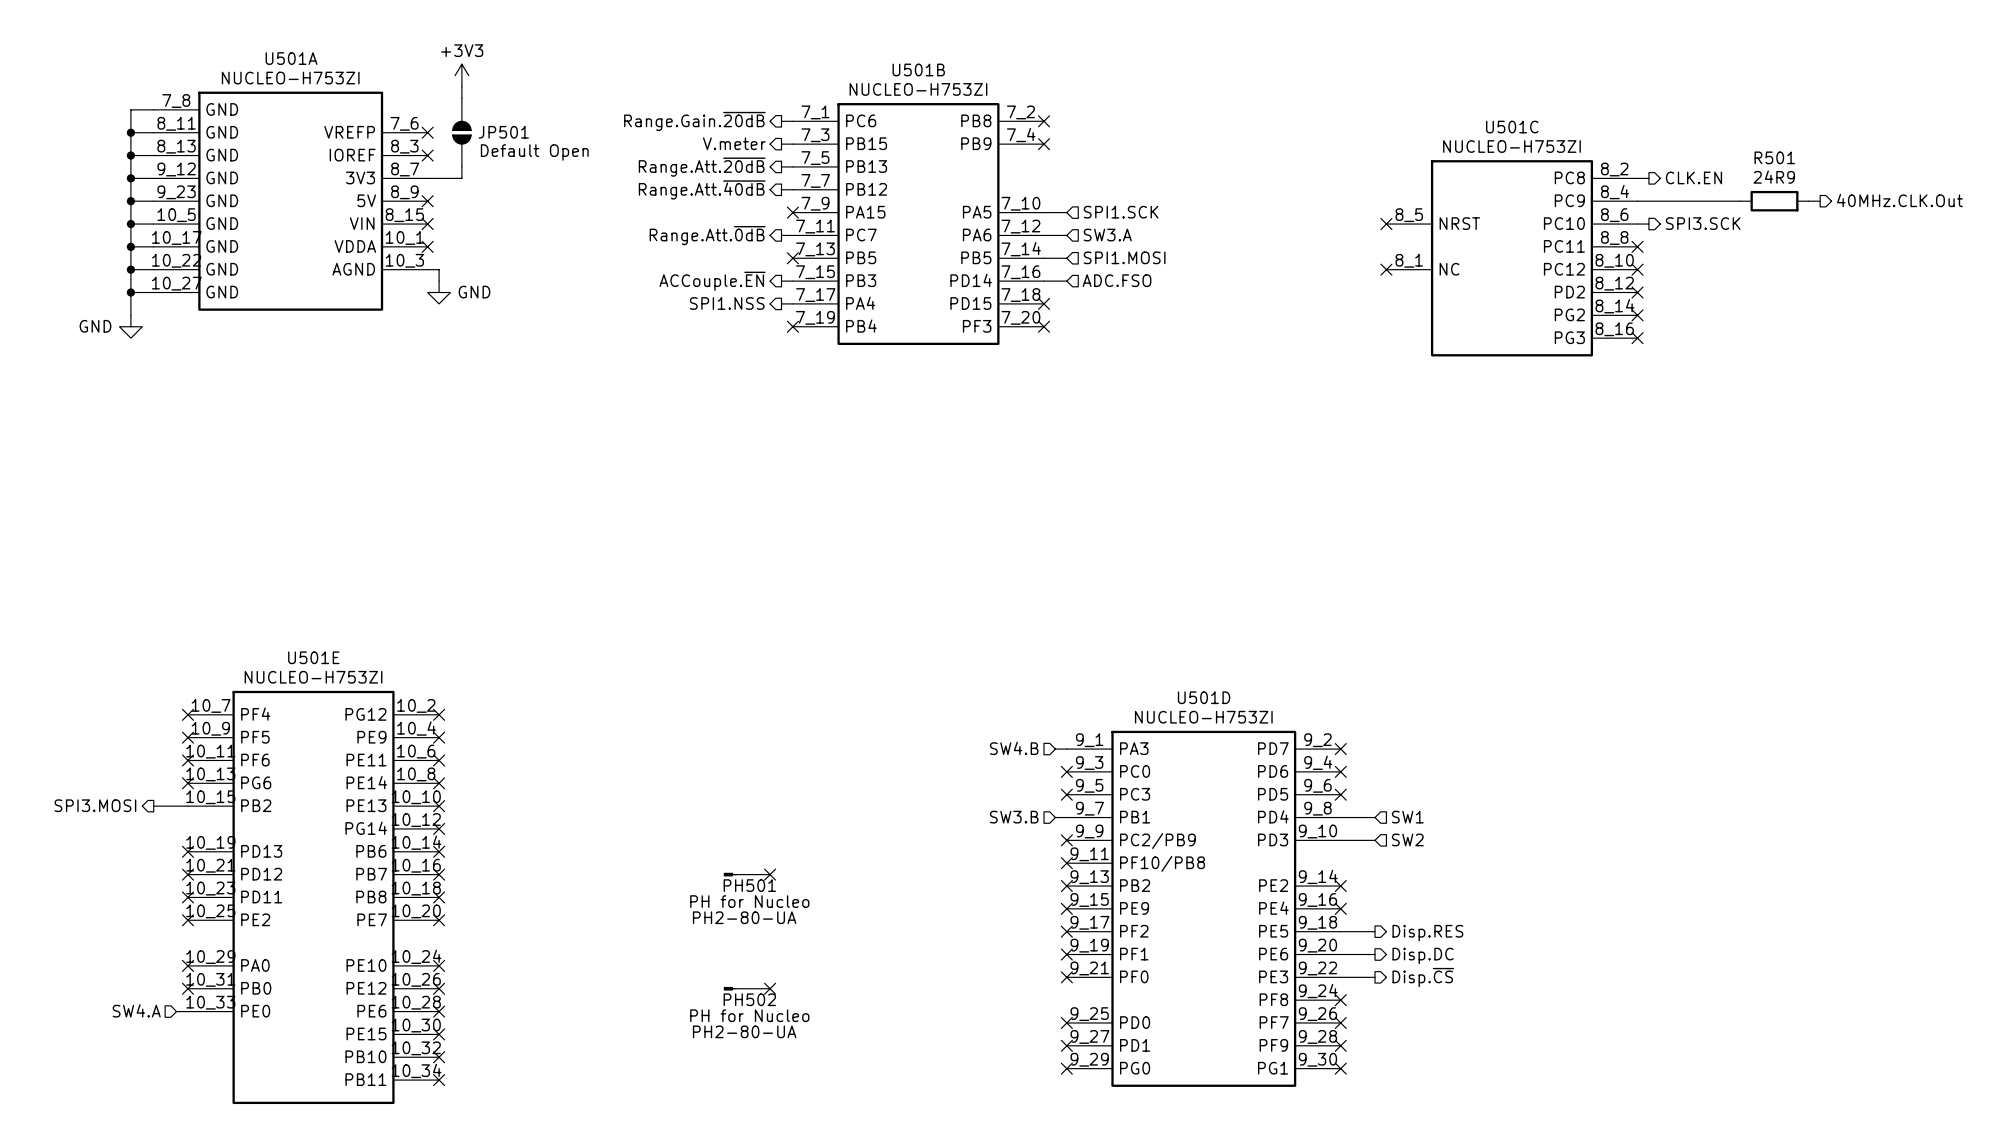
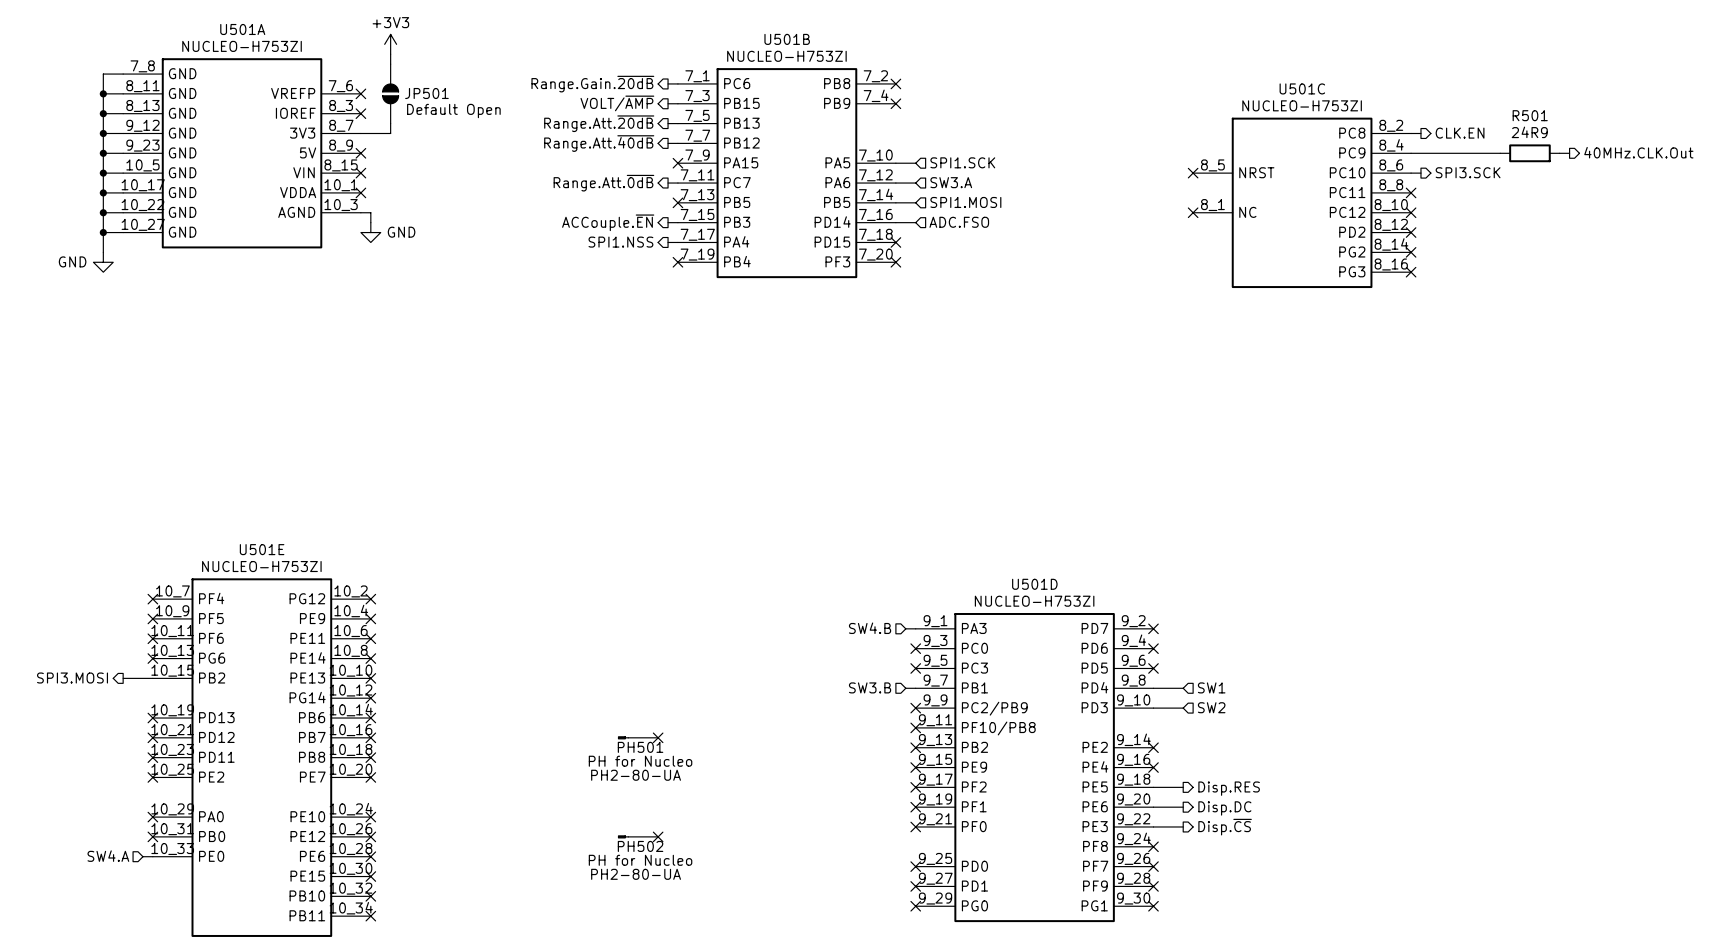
hierarchical label: V.meter (734, 143) -> VOLT/~{AMP} (617, 103)

